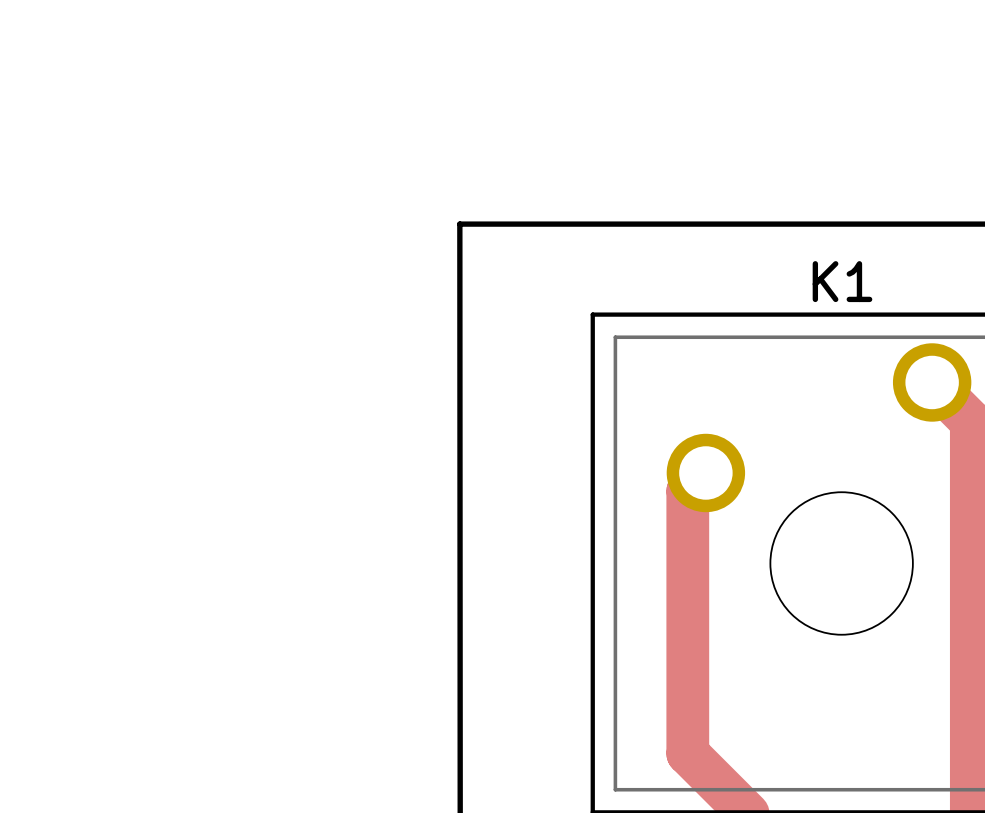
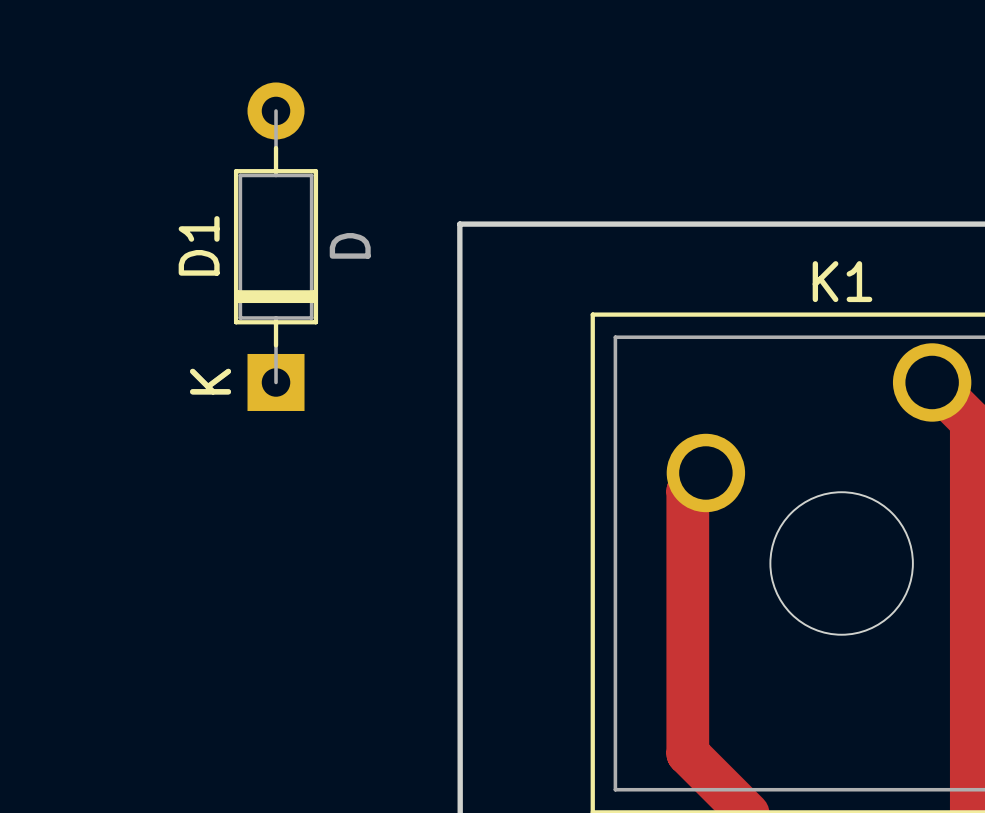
D1: none -> D (276, 246)

